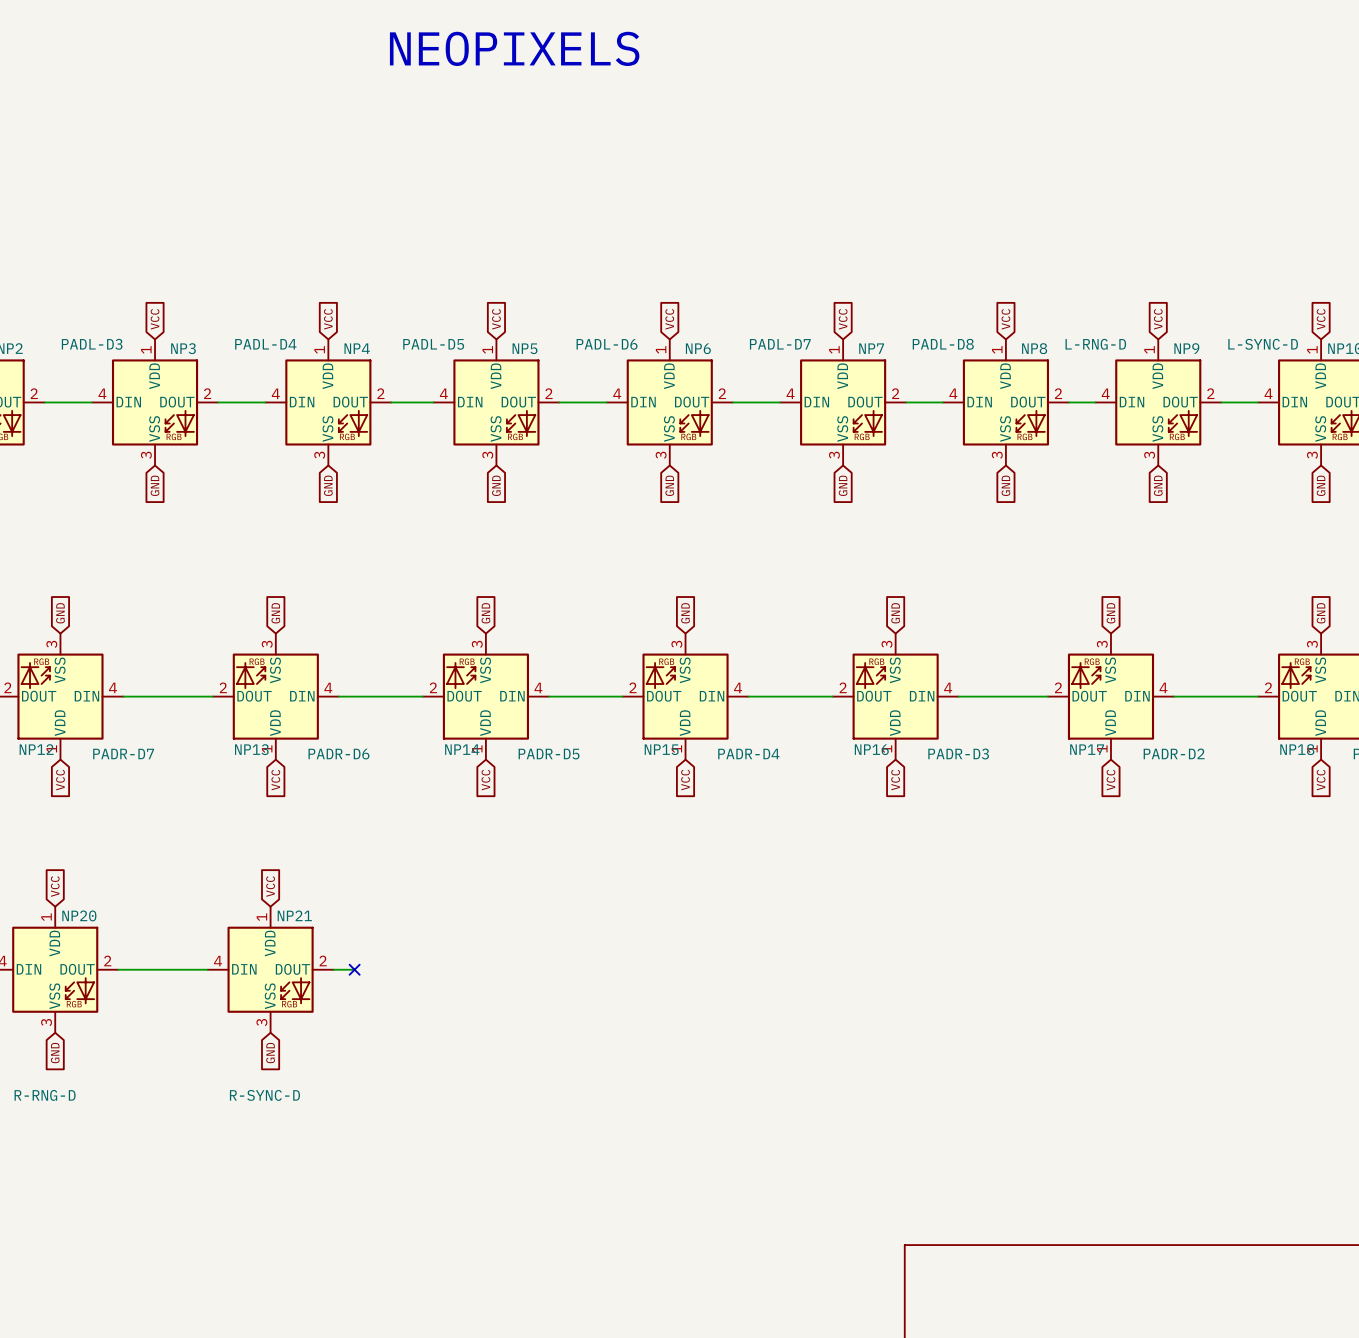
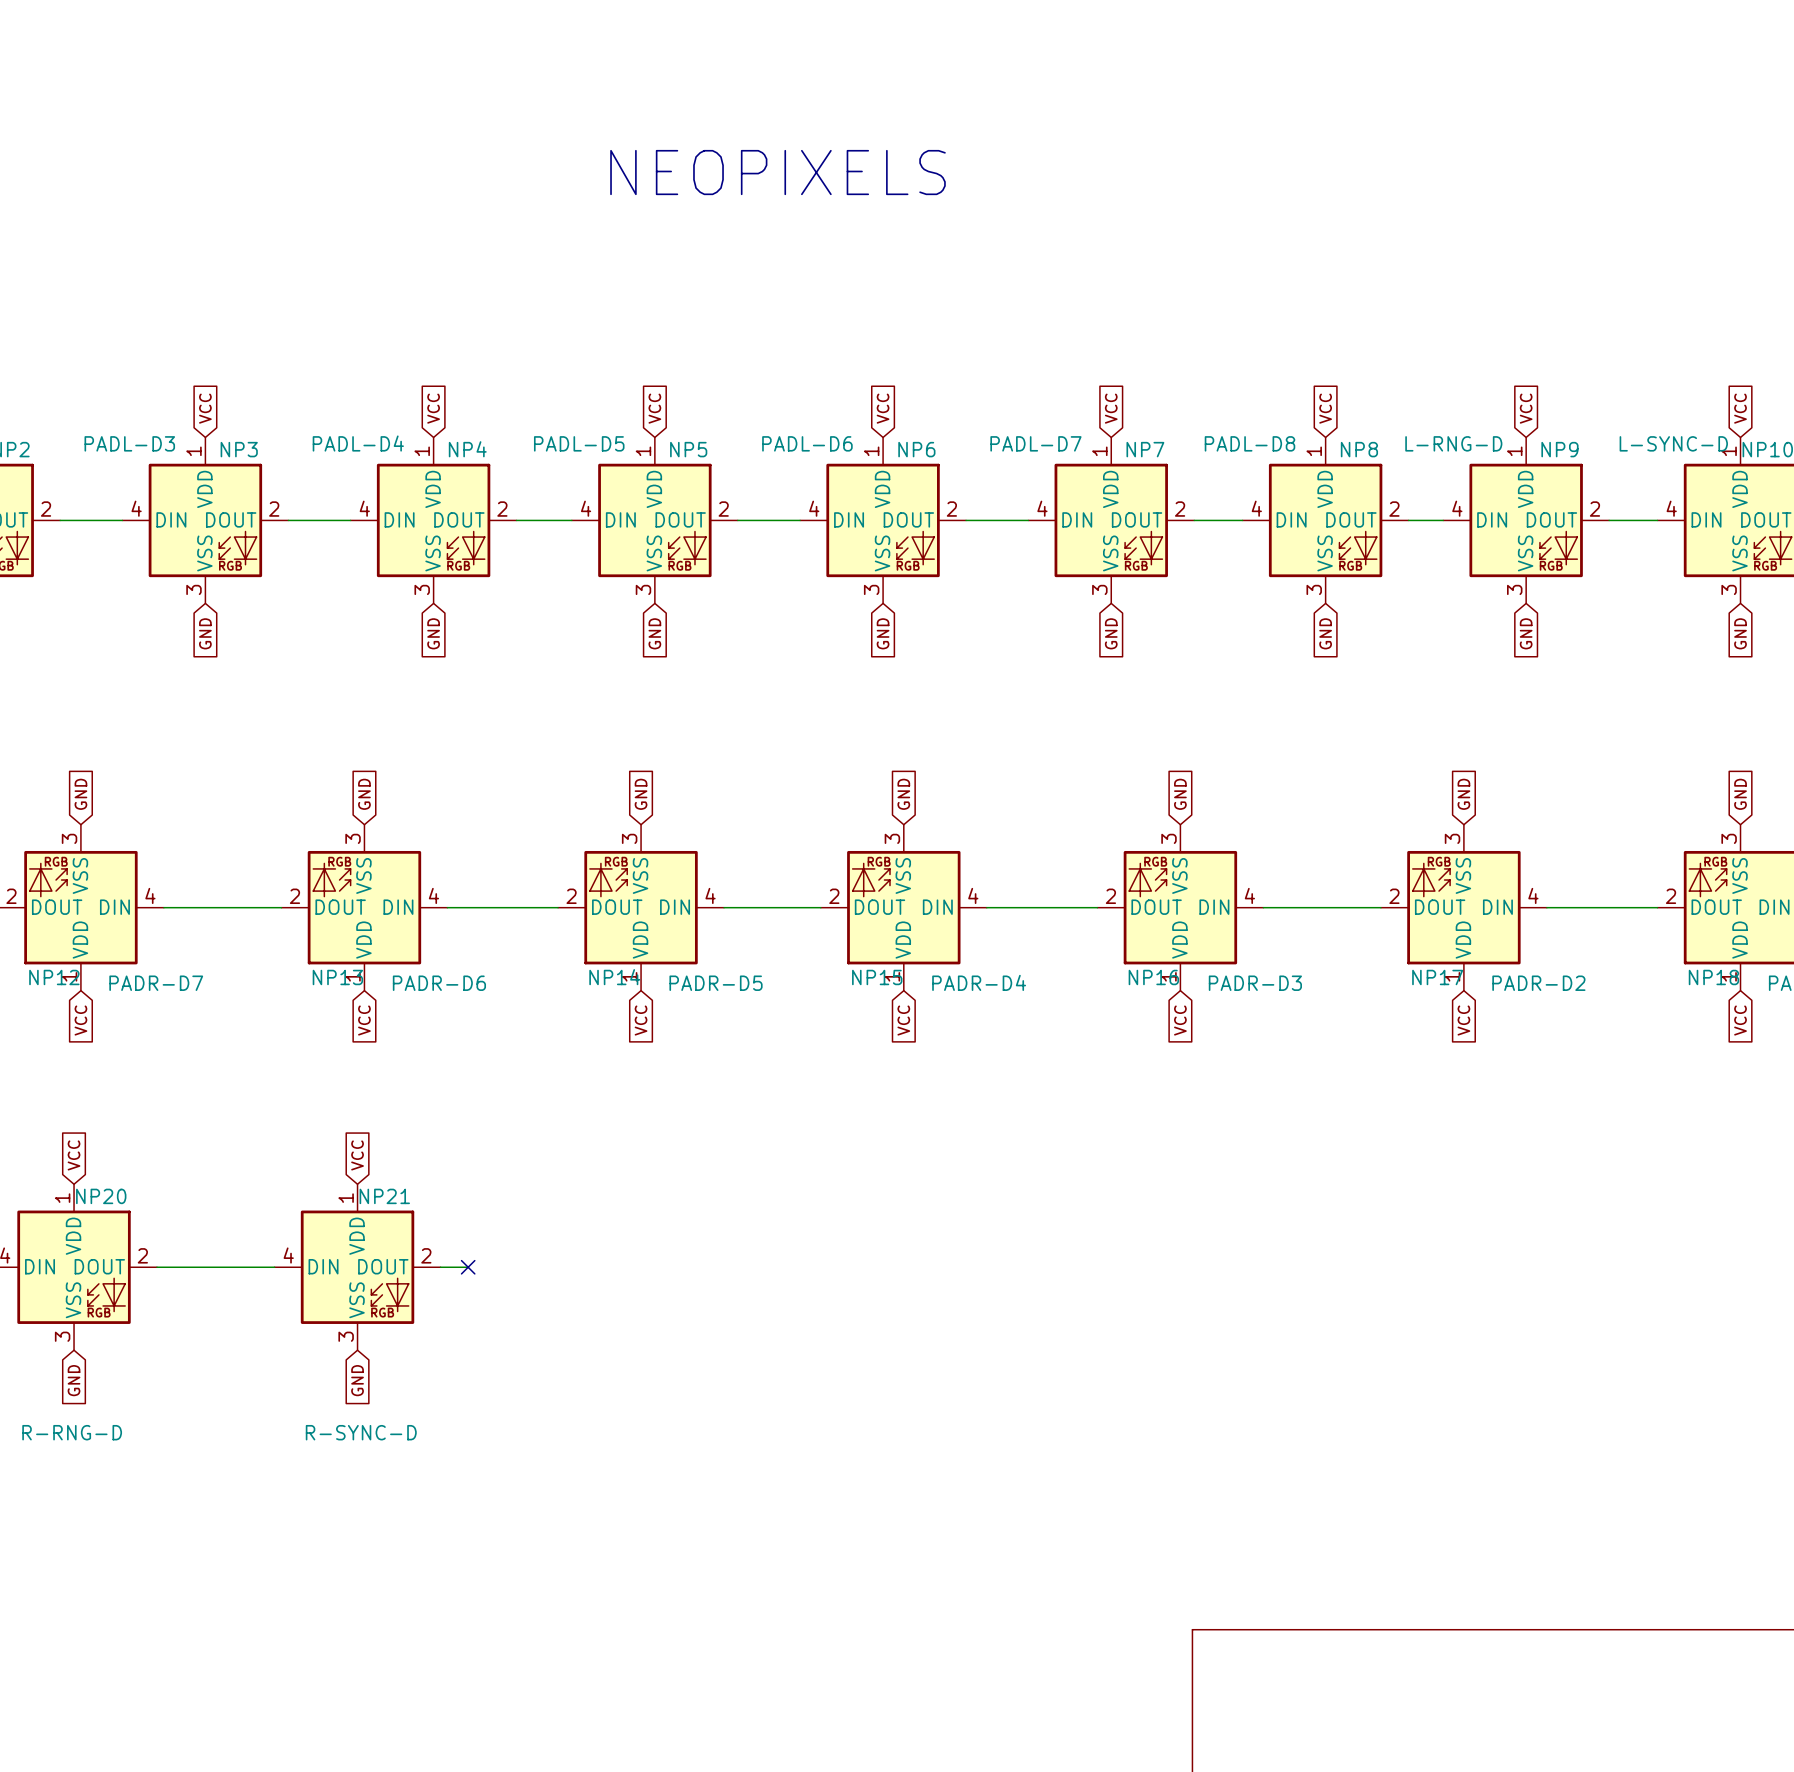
text position: NEOPIXELS (514, 48) -> NEOPIXELS (777, 172)

